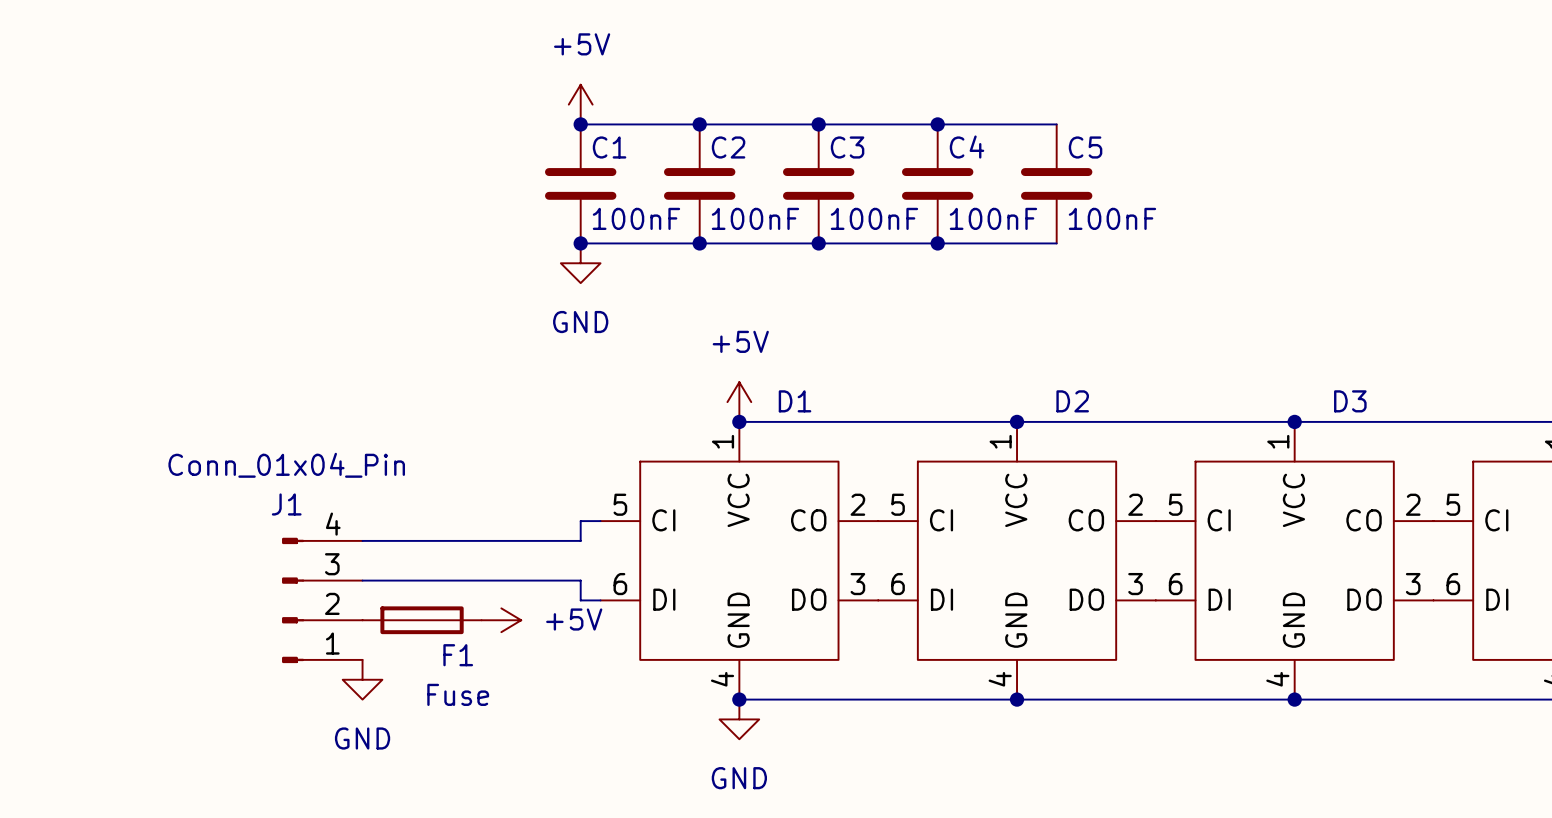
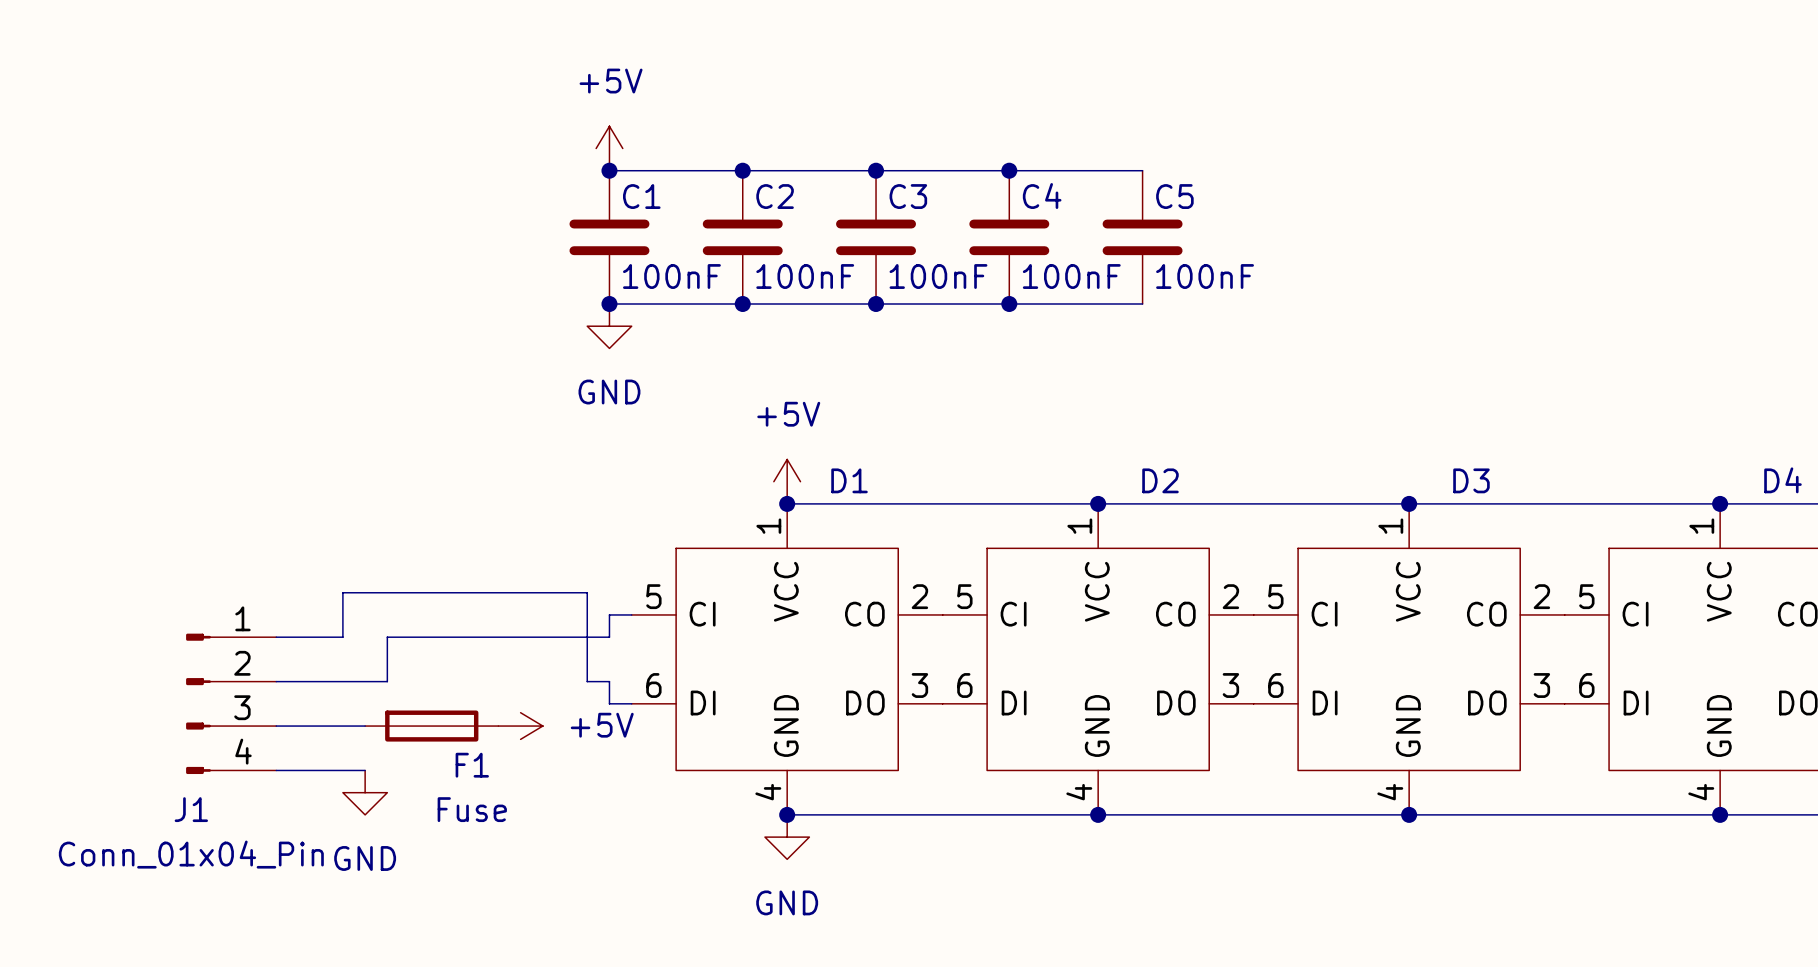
wire: (362, 540) (382, 540) -> (387, 681) (387, 637)
wire: (382, 580) (560, 580) -> (276, 637) (342, 637) (342, 592) (587, 592) (587, 681)
J1 flip: as is (293, 600) -> up-down (198, 703)
J1 position: (322, 600) -> (231, 703)

